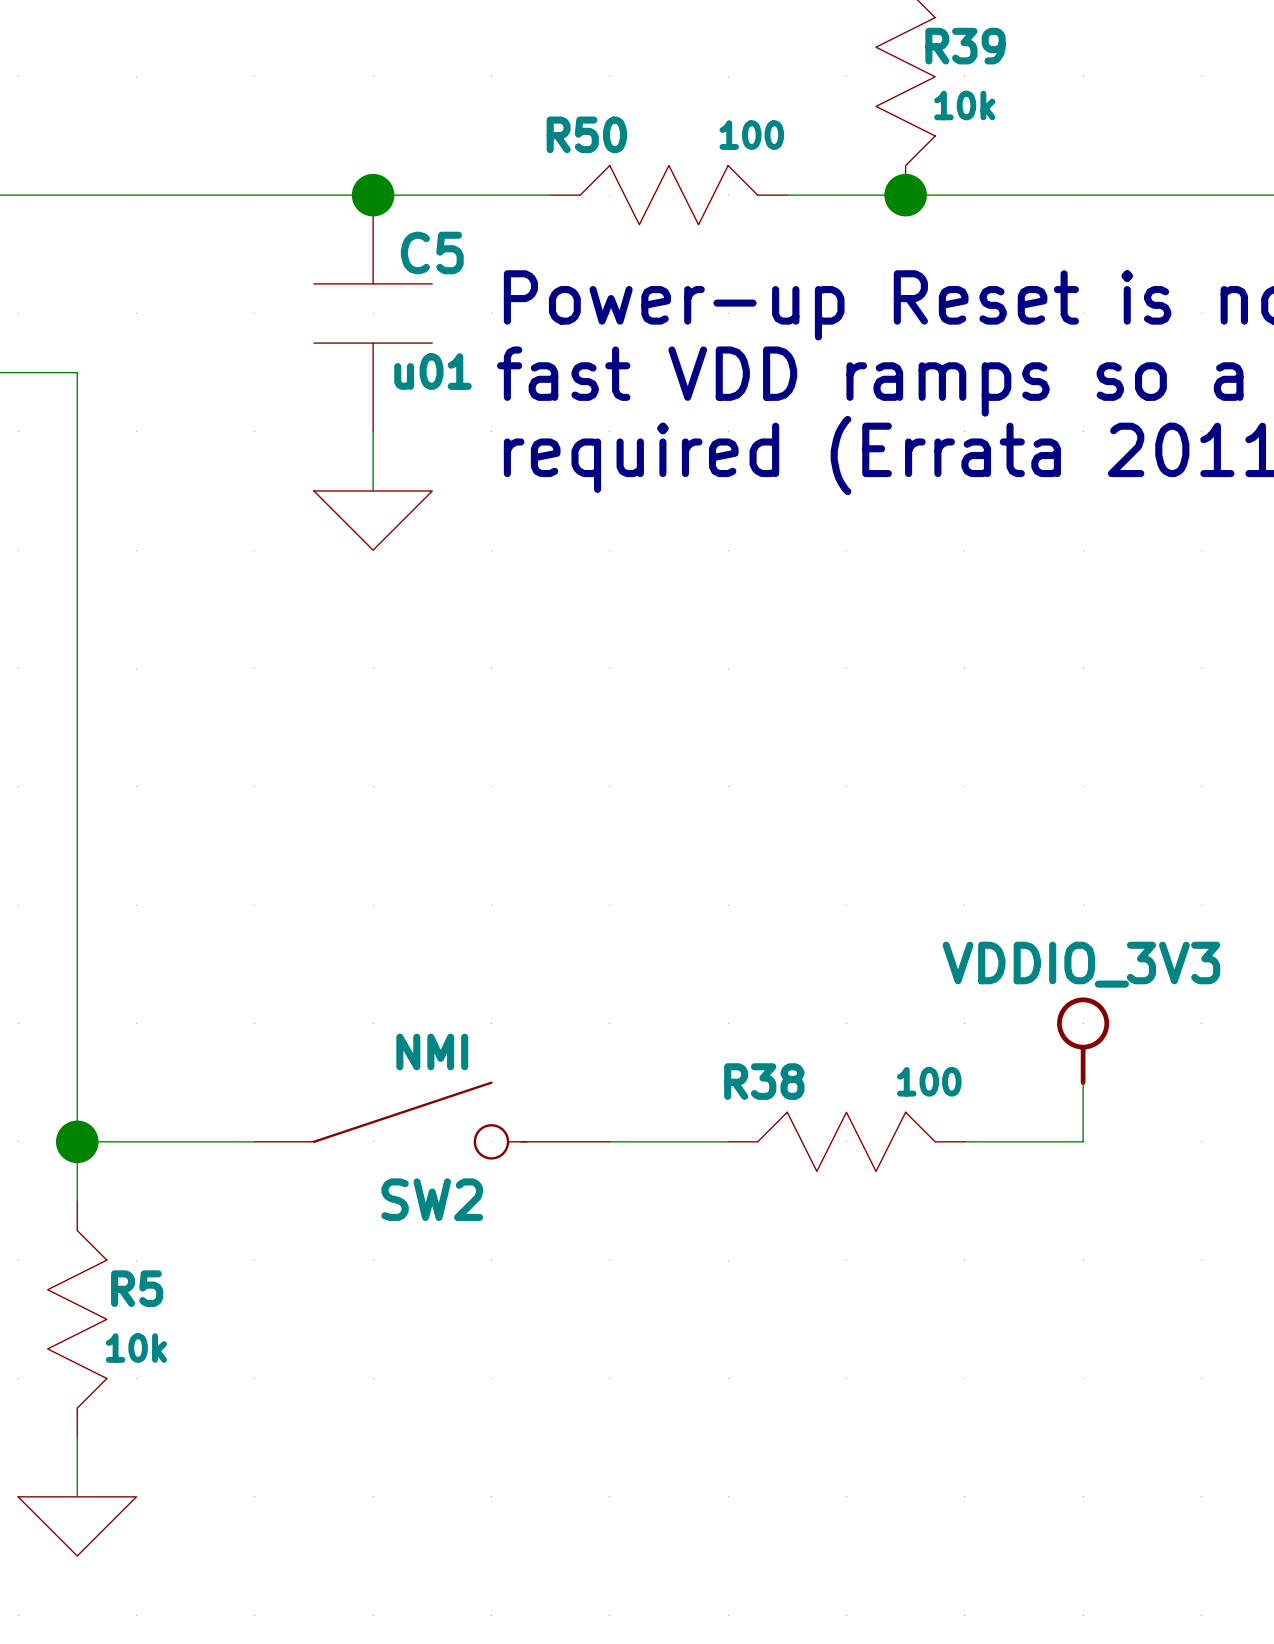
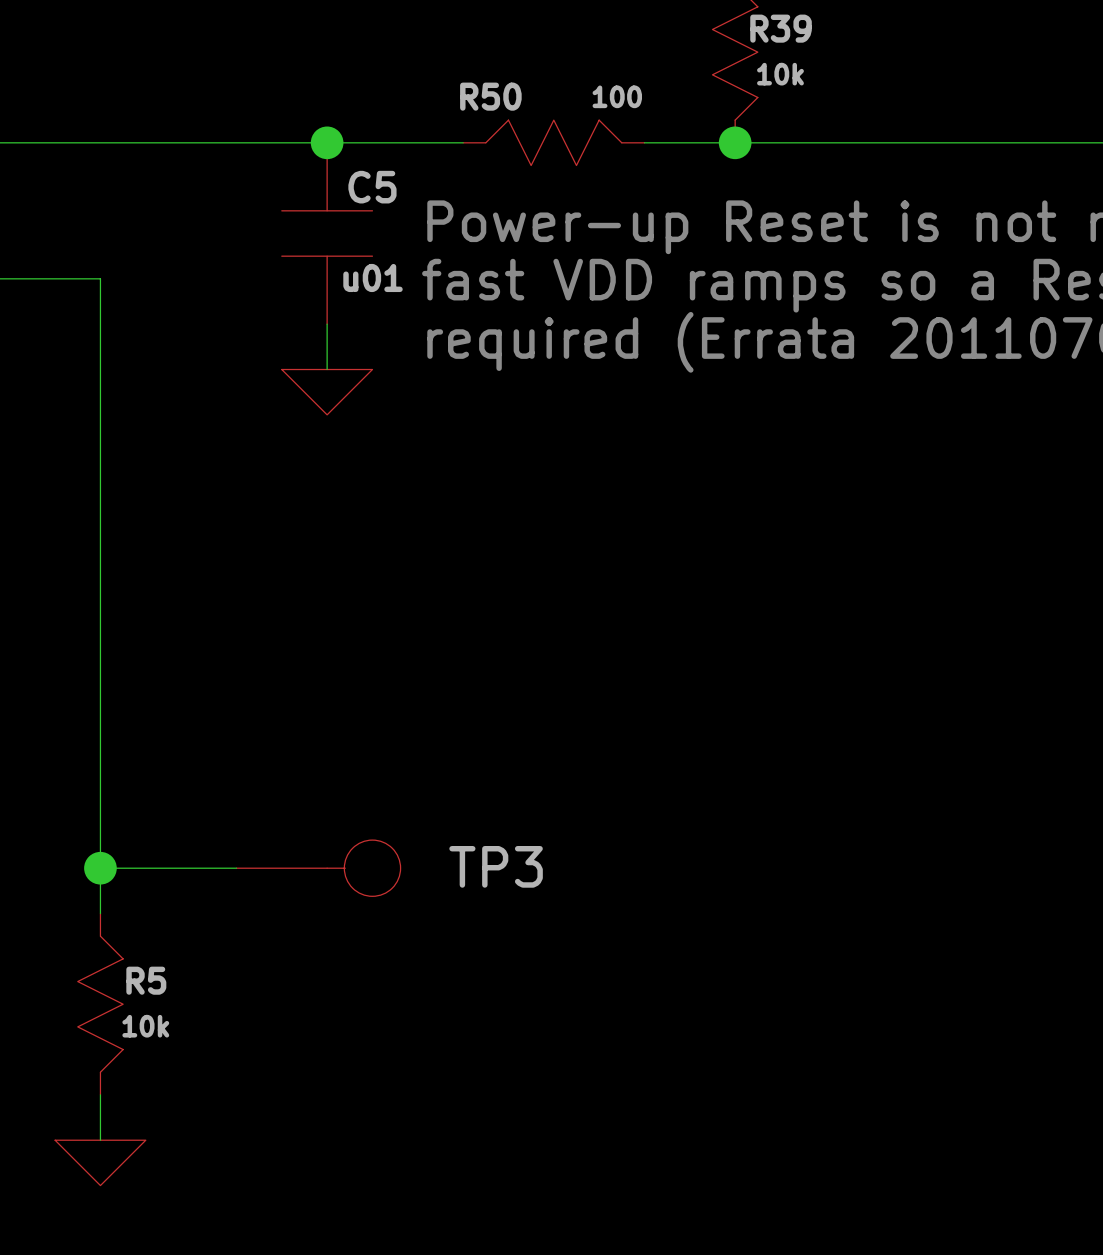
power symbol: VDDIO_3V3 (1083, 1041) -> none
wire: (1083, 1082) (1083, 1141) (964, 1141) -> none
SW2: NMI (432, 1120) -> none
TP3: none -> (318, 868)
wire: (609, 1141) (728, 1141) -> none
R38: 100 (846, 1141) -> none

